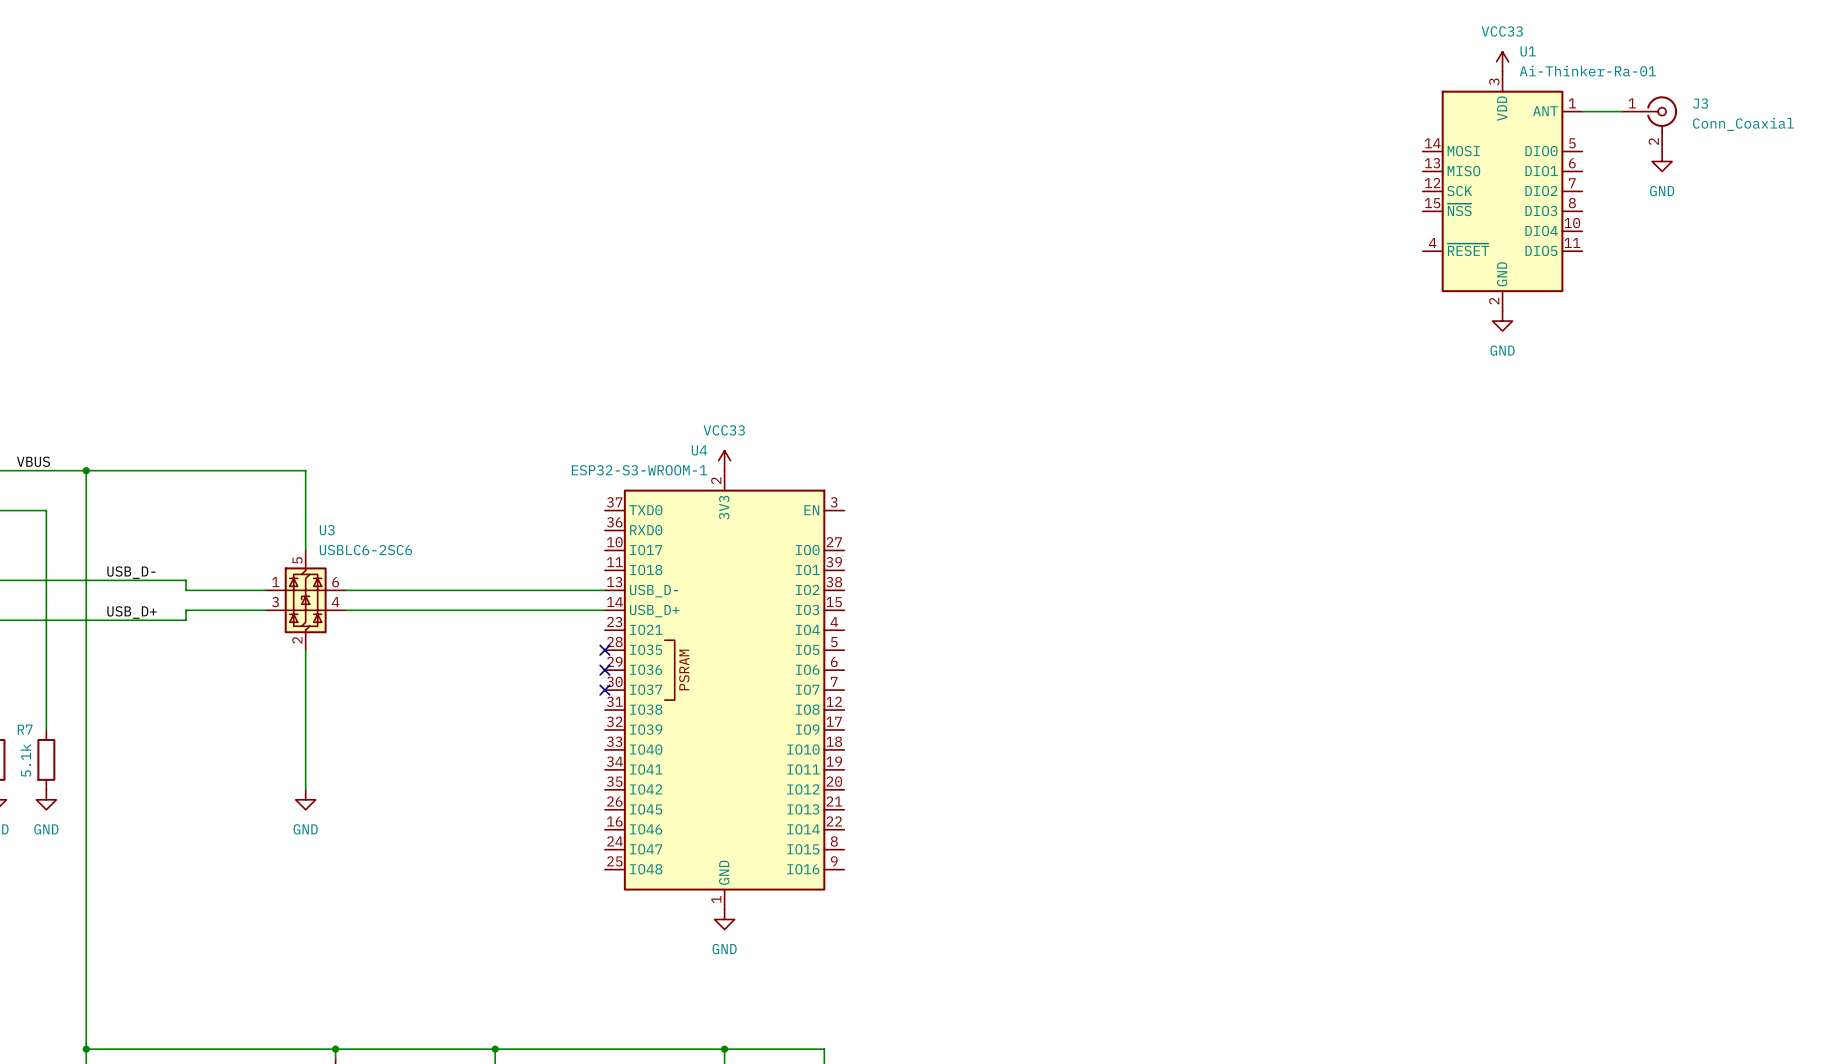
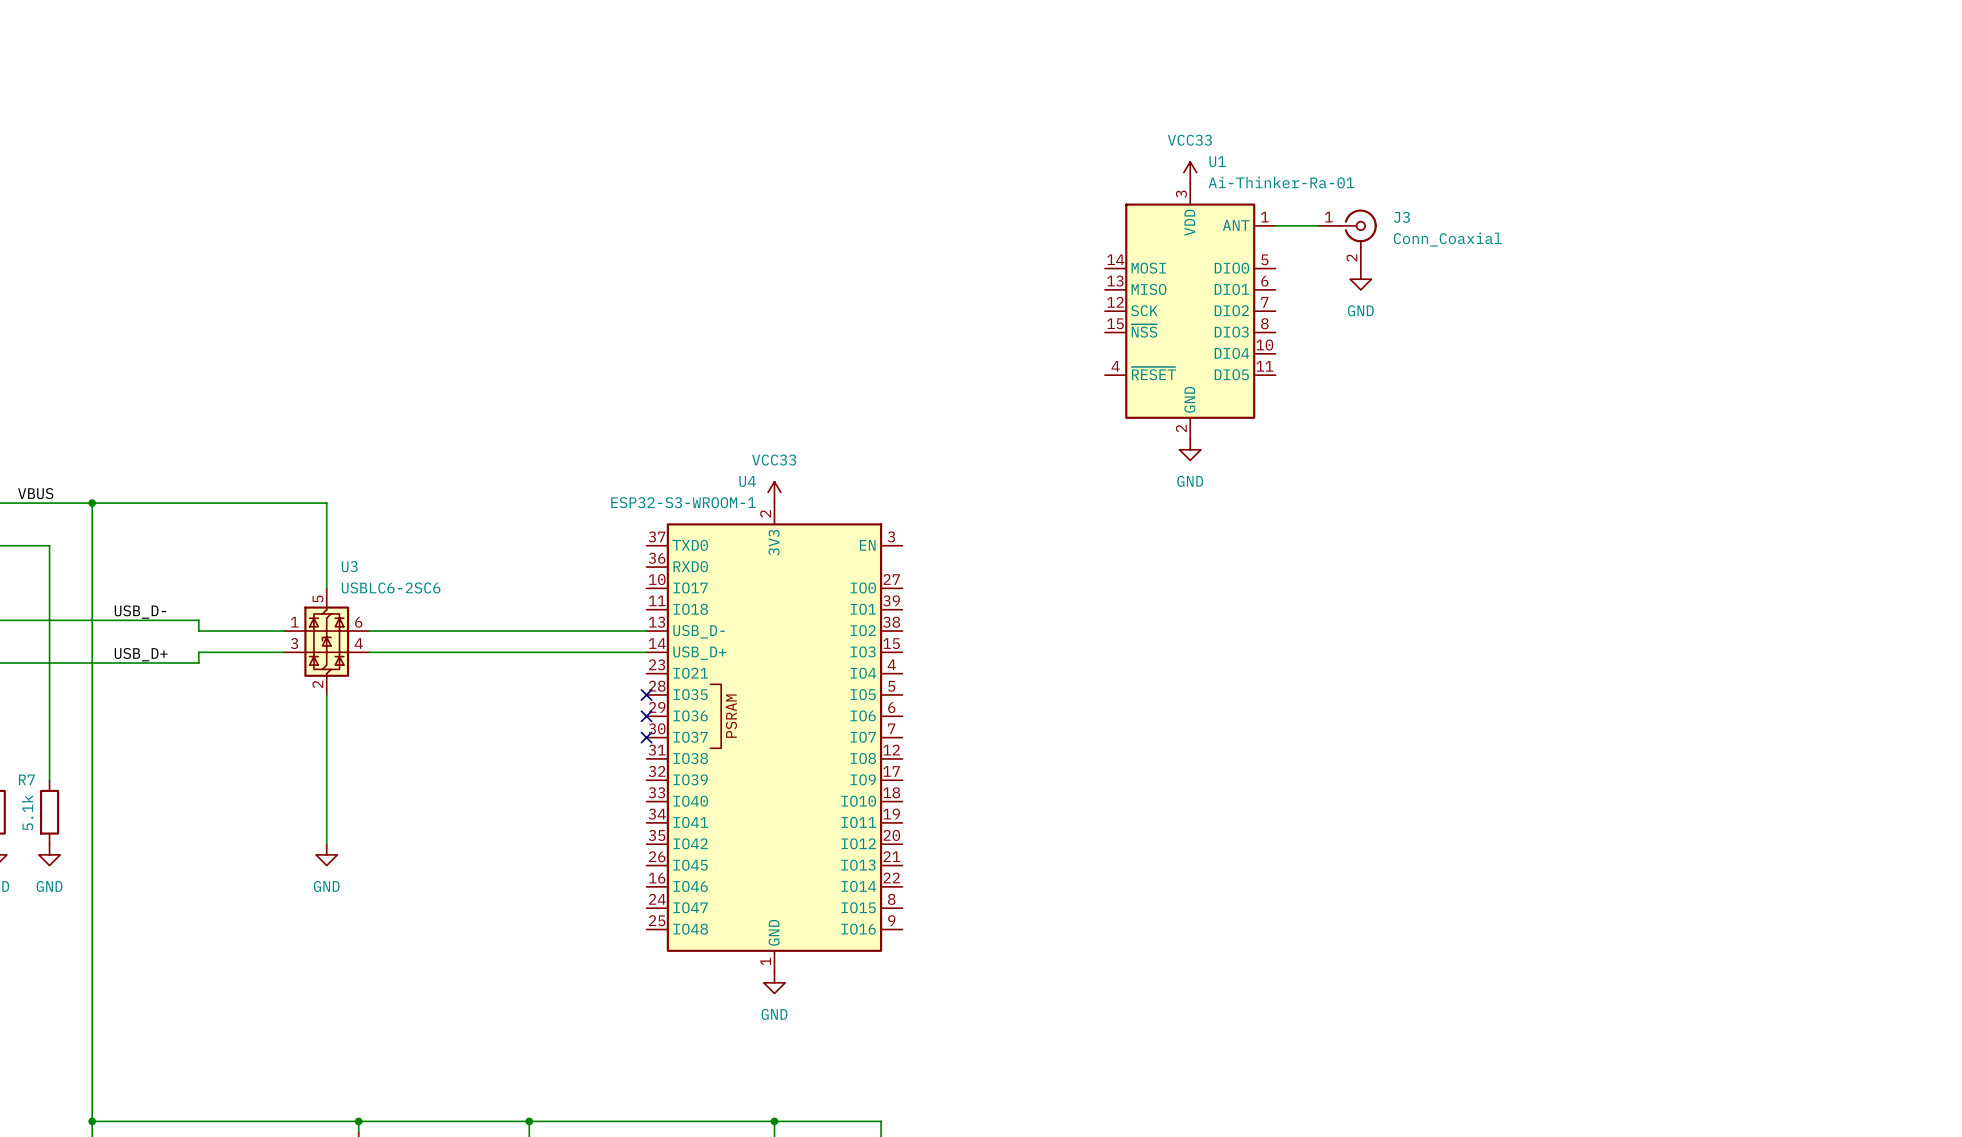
power symbol: VCC33 (1502, 61) -> none
wire: (1582, 111) (1622, 111) -> none
J3 position: (1649, 123) -> (1347, 239)
power symbol: none -> VCC33 (1190, 172)
power symbol: GND (1662, 161) -> none
U1 position: (1502, 191) -> (1190, 311)
wire: none -> (1275, 225) (1318, 225)
power symbol: none -> GND (1360, 279)
power symbol: GND (1502, 321) -> none
power symbol: none -> GND (1190, 449)

